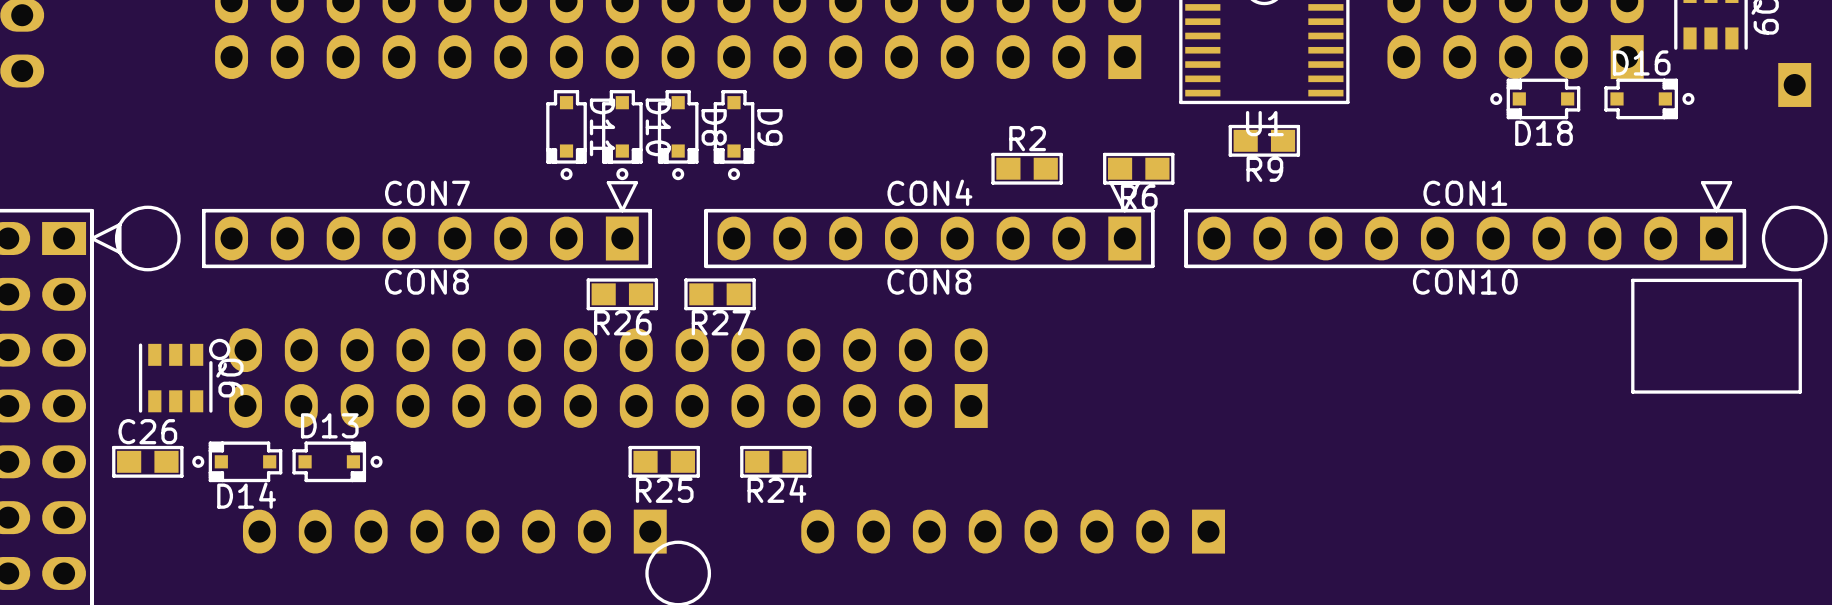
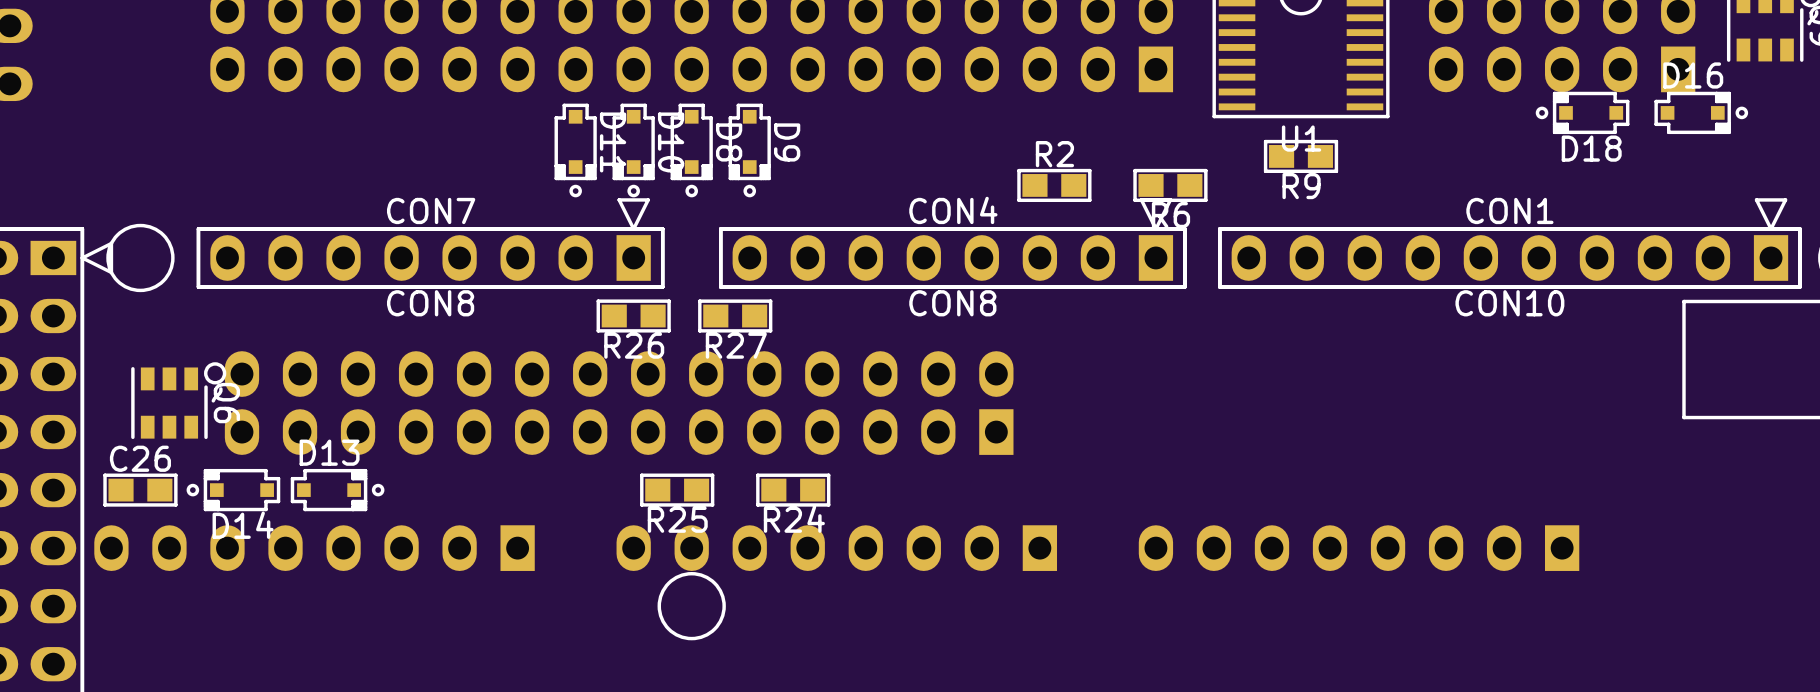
part: none -> (836, 548)
part: none -> (1359, 548)
part position: (454, 531) -> (314, 548)
part: (1013, 531) -> none

